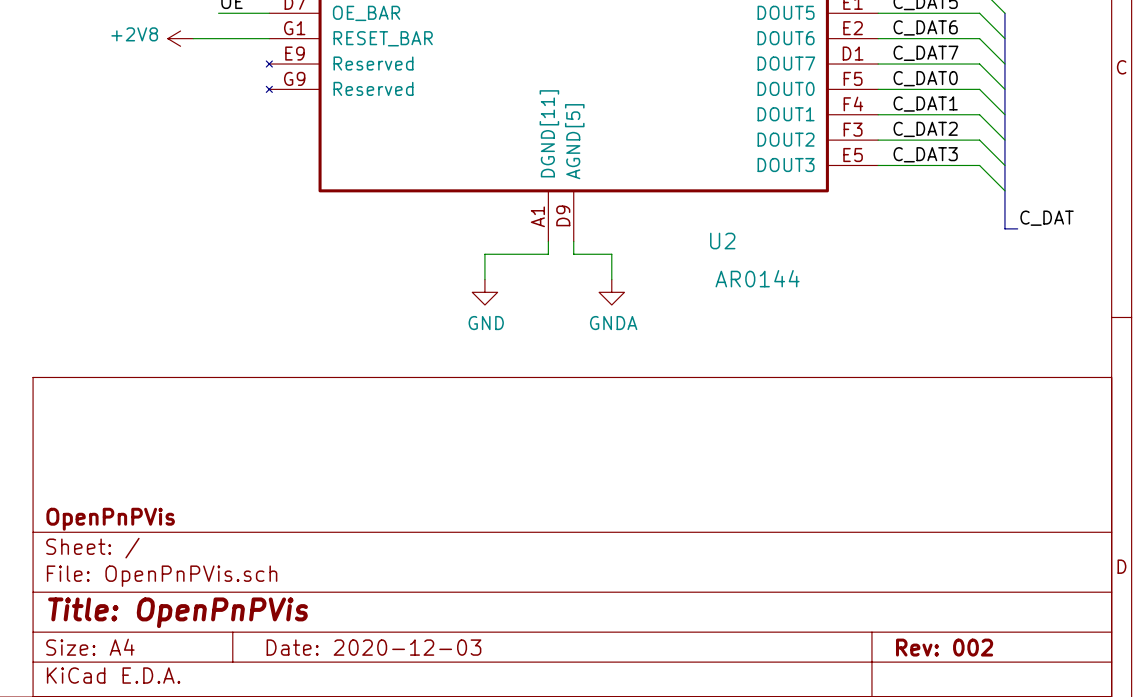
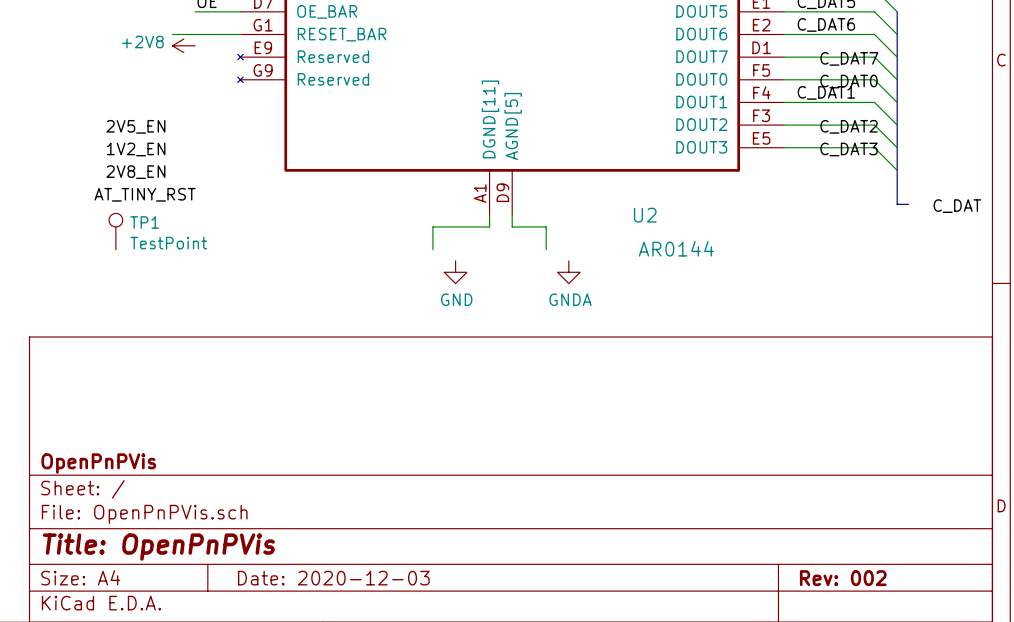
power symbol position: +2V8 (180, 38) -> +2V8 (183, 45)
label position: C_DAT7 (925, 53) -> C_DAT7 (849, 58)
label position: C_DAT0 (925, 78) -> C_DAT0 (849, 81)
label position: C_DAT2 (925, 129) -> C_DAT2 (849, 126)
label: none -> 2V5_EN (135, 126)
label position: C_DAT3 (925, 154) -> C_DAT3 (849, 149)
label: none -> 1V2_EN (136, 149)
label: none -> 2V8_EN (135, 172)
label: none -> AT_TINY_RST (145, 194)
label position: C_DAT (1047, 218) -> C_DAT (957, 206)
TP1: none -> TestPoint (115, 231)
power symbol position: GND (484, 292) -> GND (455, 272)
power symbol position: GNDA (611, 292) -> GNDA (568, 272)

